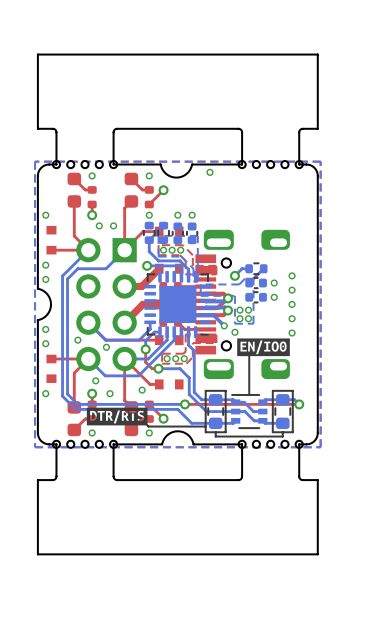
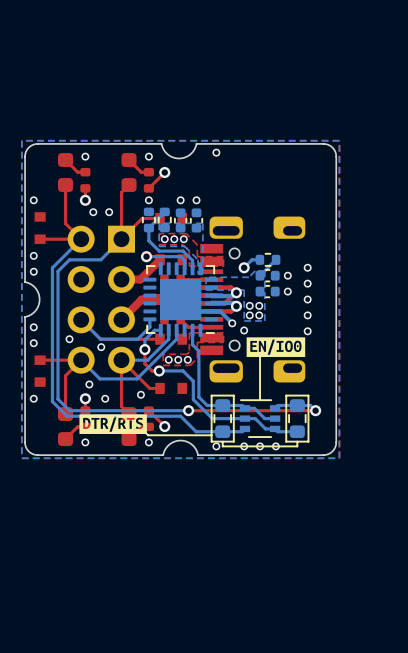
part: (85, 164) -> none
board edge: (242, 164) (242, 131) (238, 128) (116, 128) (113, 131) (113, 164) -> (45, 143) (109, 143)
part: (270, 164) -> none
board edge: (299, 164) (299, 130) (302, 128) (317, 128) (317, 54) (37, 54) (37, 128) (53, 128) (56, 130) (56, 164) -> (315, 143) (252, 143)
via: none -> (216, 446)
via: none -> (244, 446)
via: none -> (260, 446)
via: none -> (275, 446)
part: (85, 444) -> none
board edge: (242, 444) (242, 476) (238, 480) (116, 480) (113, 476) (113, 444) -> (45, 455) (109, 455)
part: (270, 444) -> none
board edge: (299, 444) (299, 478) (302, 480) (317, 480) (317, 554) (37, 554) (37, 480) (53, 480) (56, 478) (56, 444) -> (315, 455) (252, 455)

